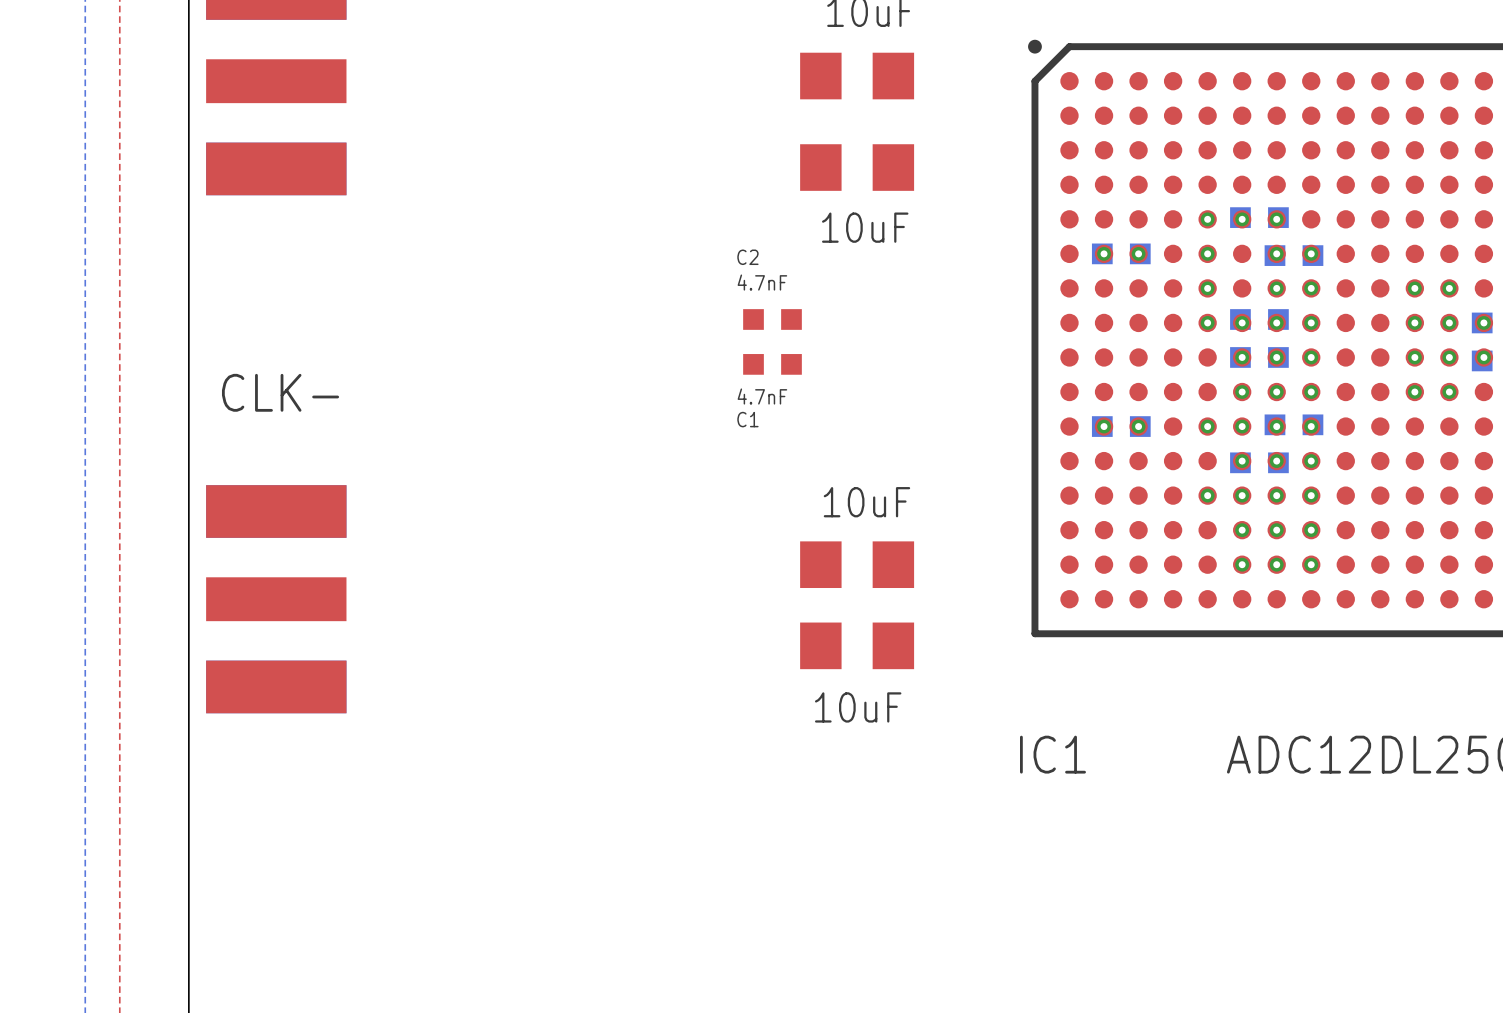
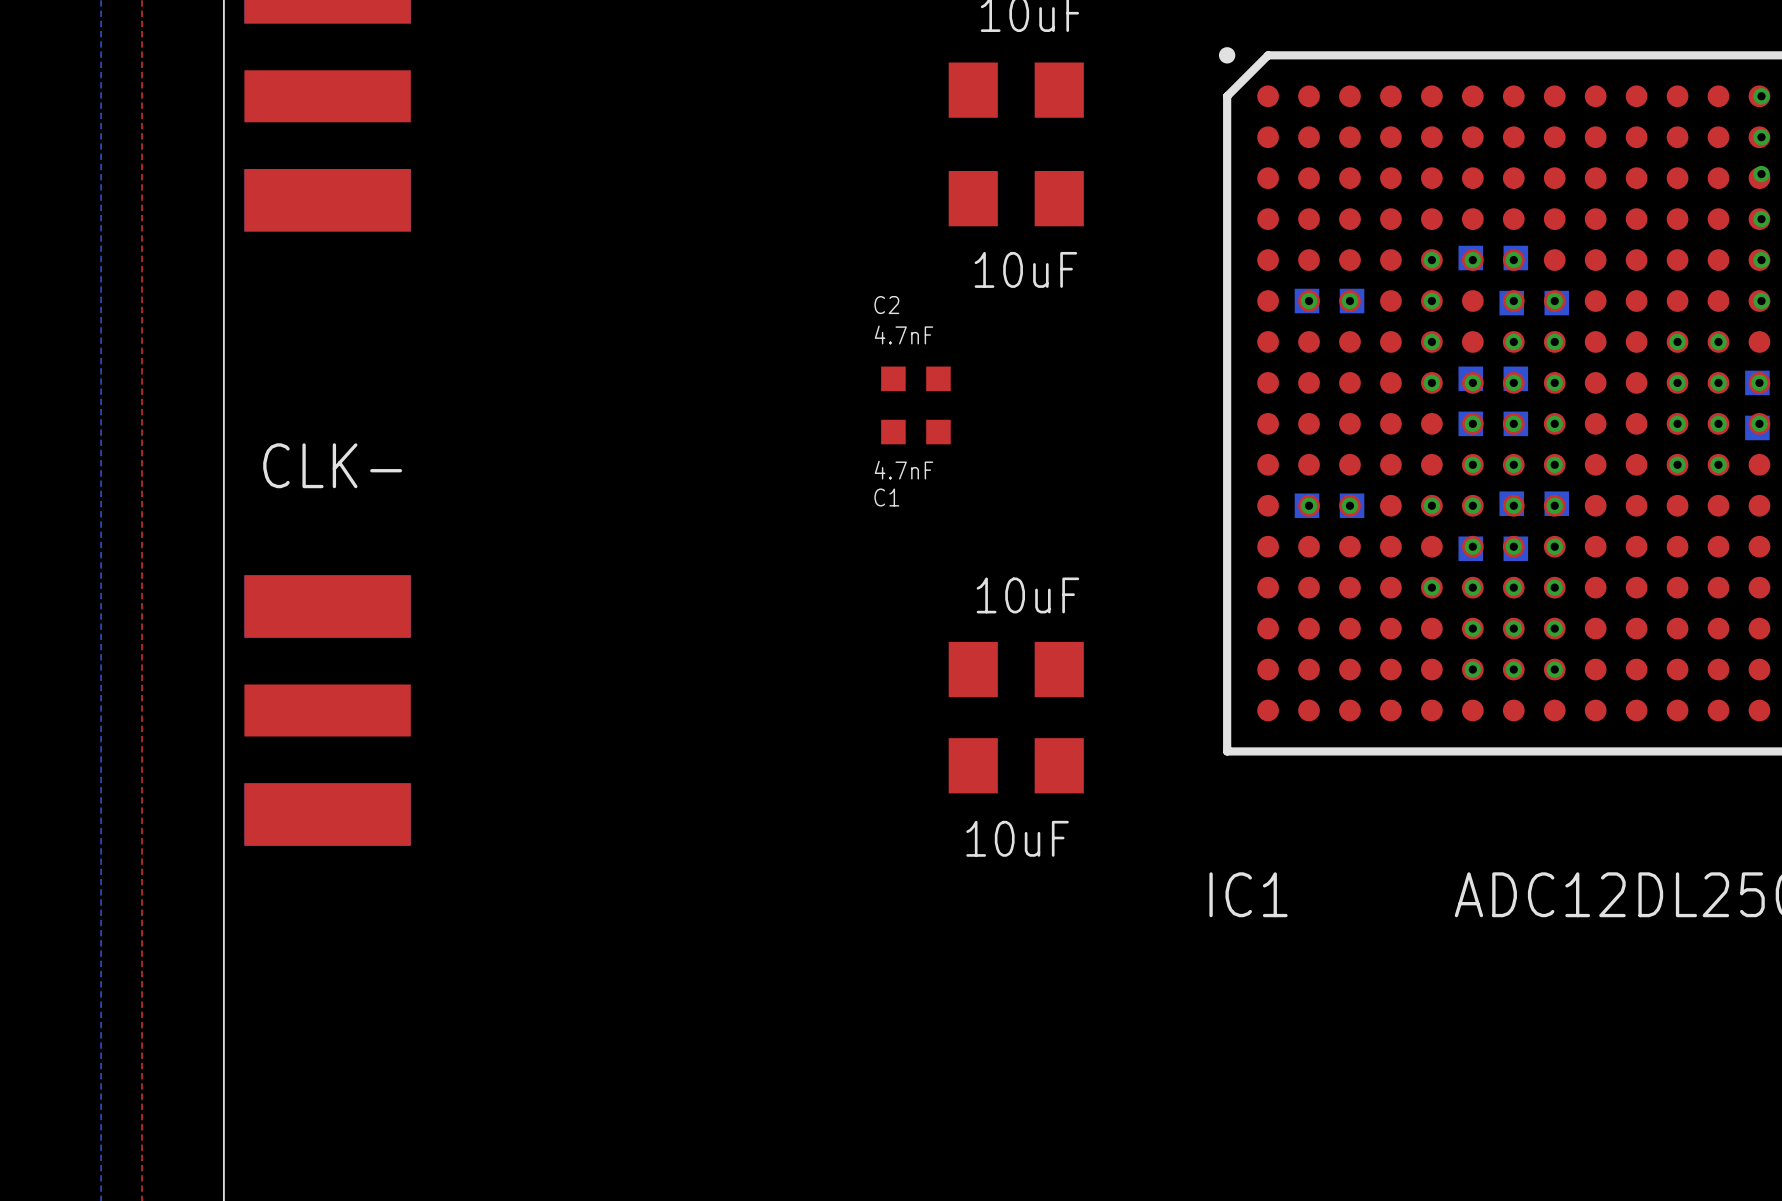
via: none -> (1761, 96)
via: none -> (1761, 137)
via: none -> (1761, 174)
via: none -> (1761, 219)
via: none -> (1761, 260)
via: none -> (1761, 301)

